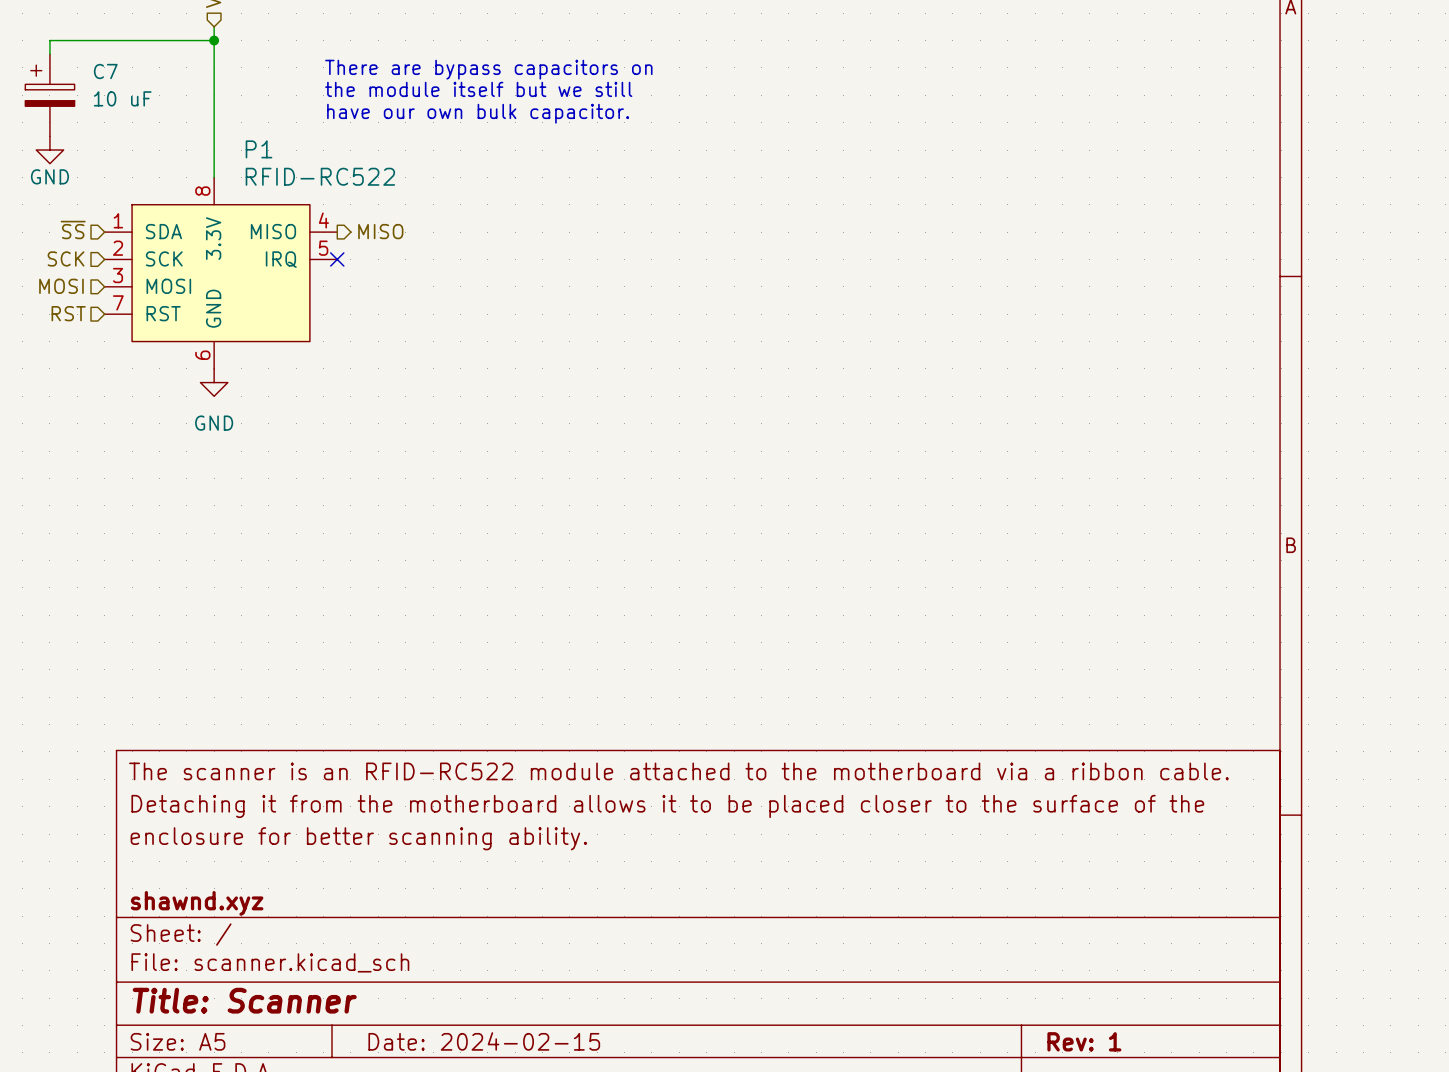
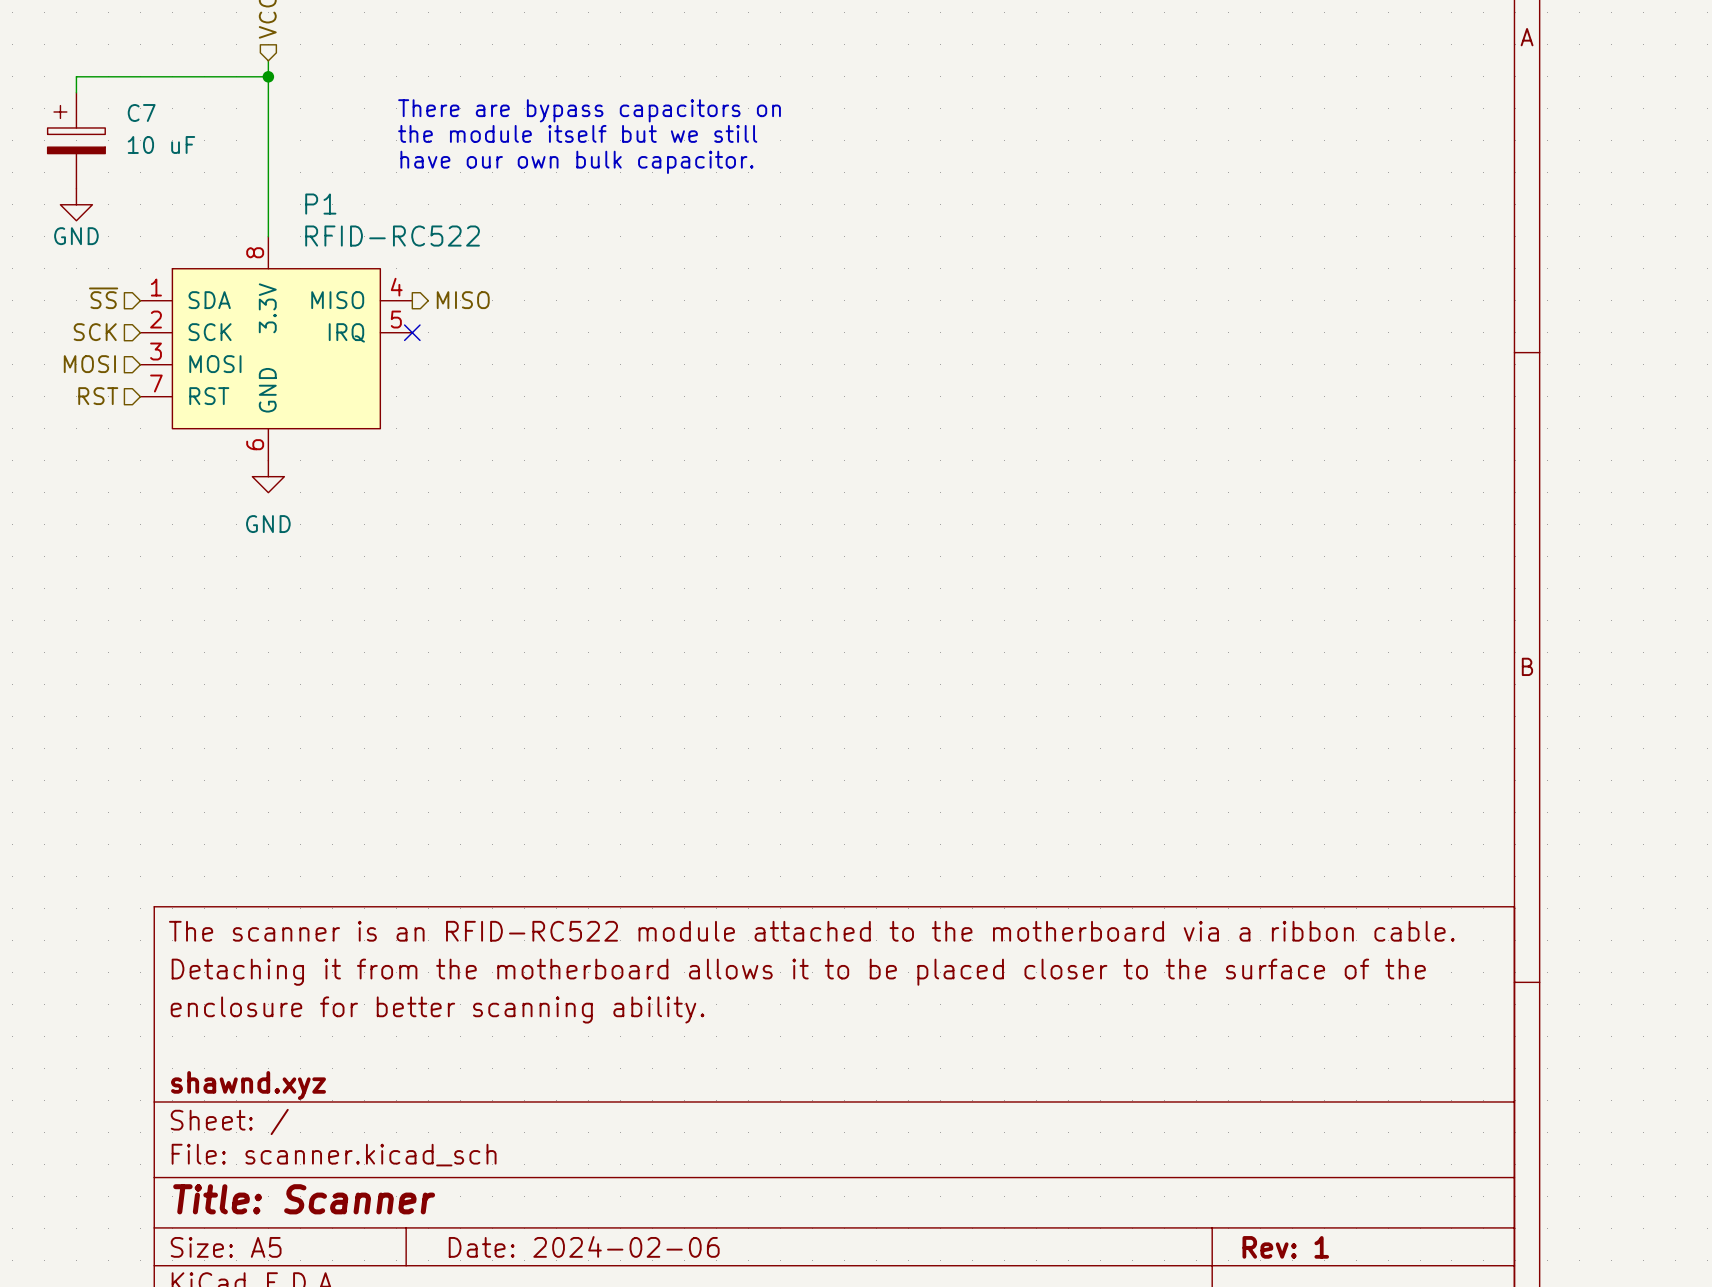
title block: Date: 2024-02-15 (484, 1041) -> Date: 2024-02-06 (584, 1246)

